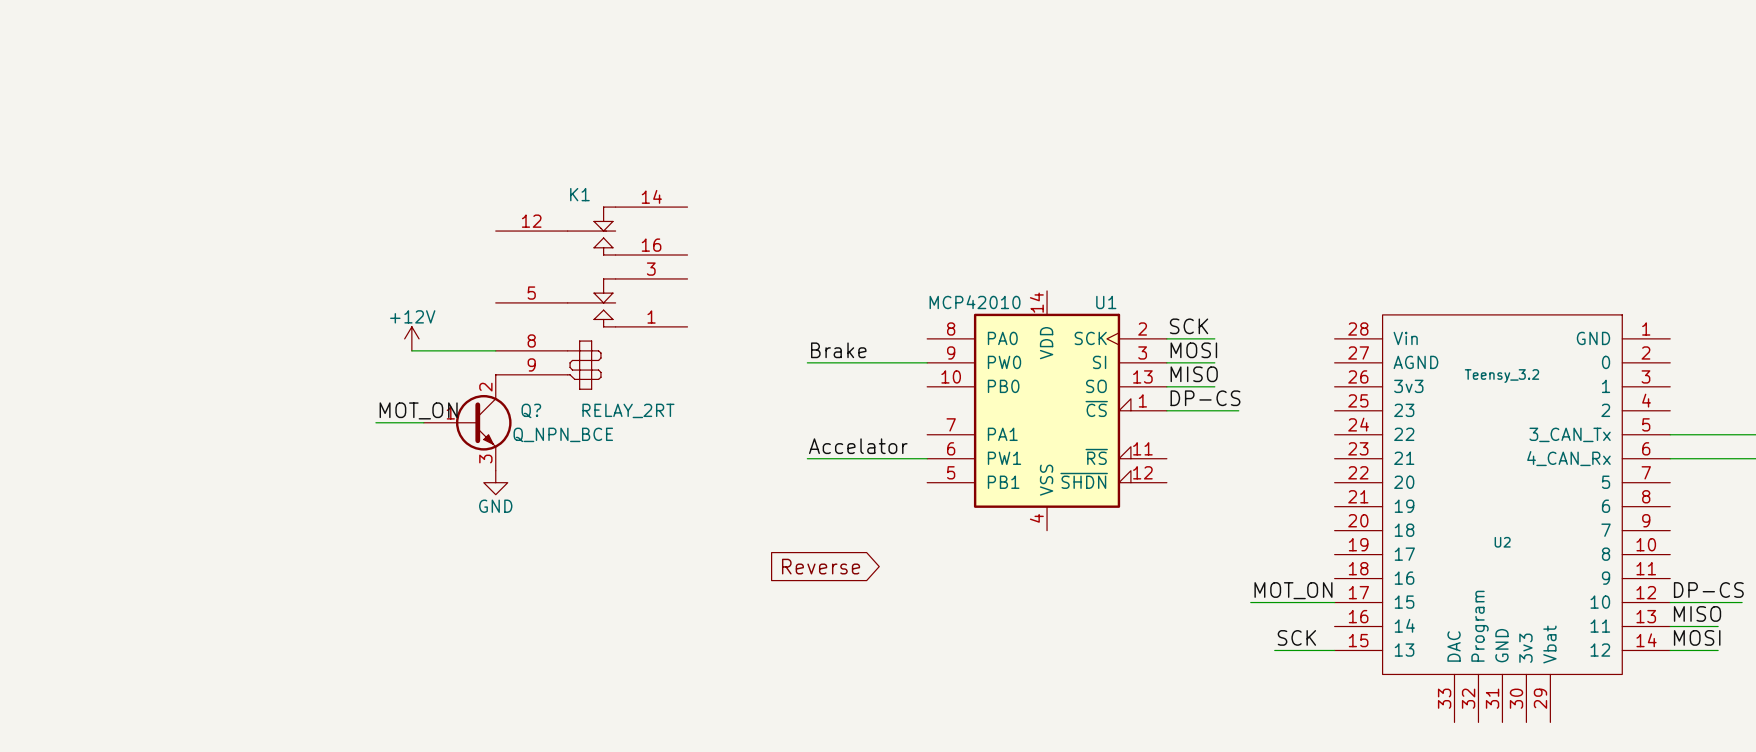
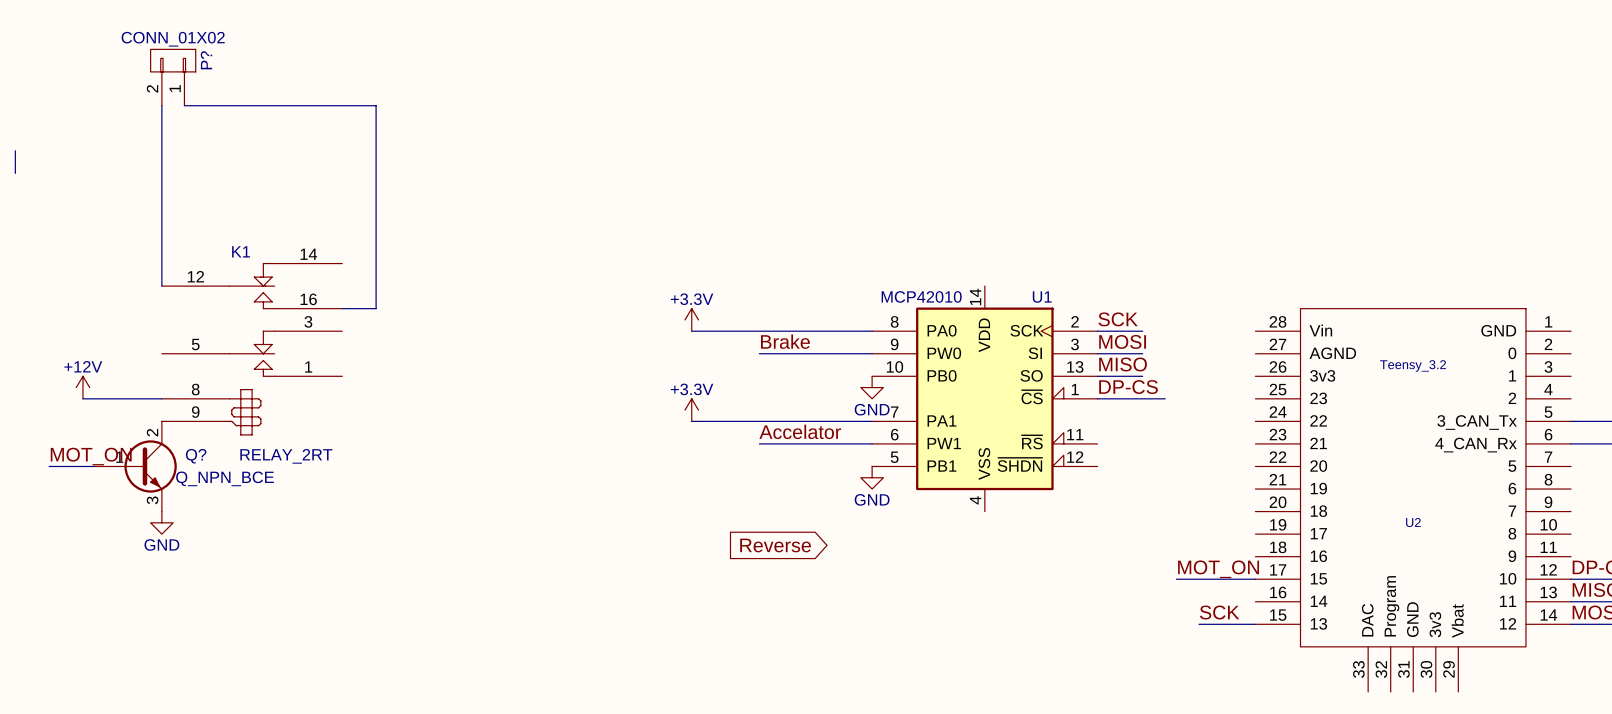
P?: none -> CONN_01X02 (173, 77)
wire: none -> (161, 105) (161, 286)
wire: none -> (184, 105) (376, 105) (376, 308) (342, 308)
wire: none -> (15, 150) (15, 173)
K1 position: (591, 298) -> (252, 349)
power symbol: none -> +3.3V (691, 319)
power symbol: +12V (411, 338) -> none
wire: none -> (691, 331) (872, 331)
wire: (411, 350) (495, 350) -> none
power symbol: none -> +12V (82, 387)
power symbol: none -> GND (872, 387)
wire: none -> (82, 398) (161, 398)
label: MOT_ON (418, 410) -> none
wire: (375, 422) (423, 422) -> none
Q?: Q_NPN_BCE (467, 422) -> none
power symbol: none -> +3.3V (691, 410)
wire: none -> (691, 421) (872, 421)
label: none -> MOT_ON (91, 456)
wire: none -> (49, 466) (94, 466)
Q?: none -> Q_NPN_BCE (135, 466)
power symbol: GND (495, 482) -> none
power symbol: none -> GND (872, 477)
power symbol: none -> GND (161, 522)

